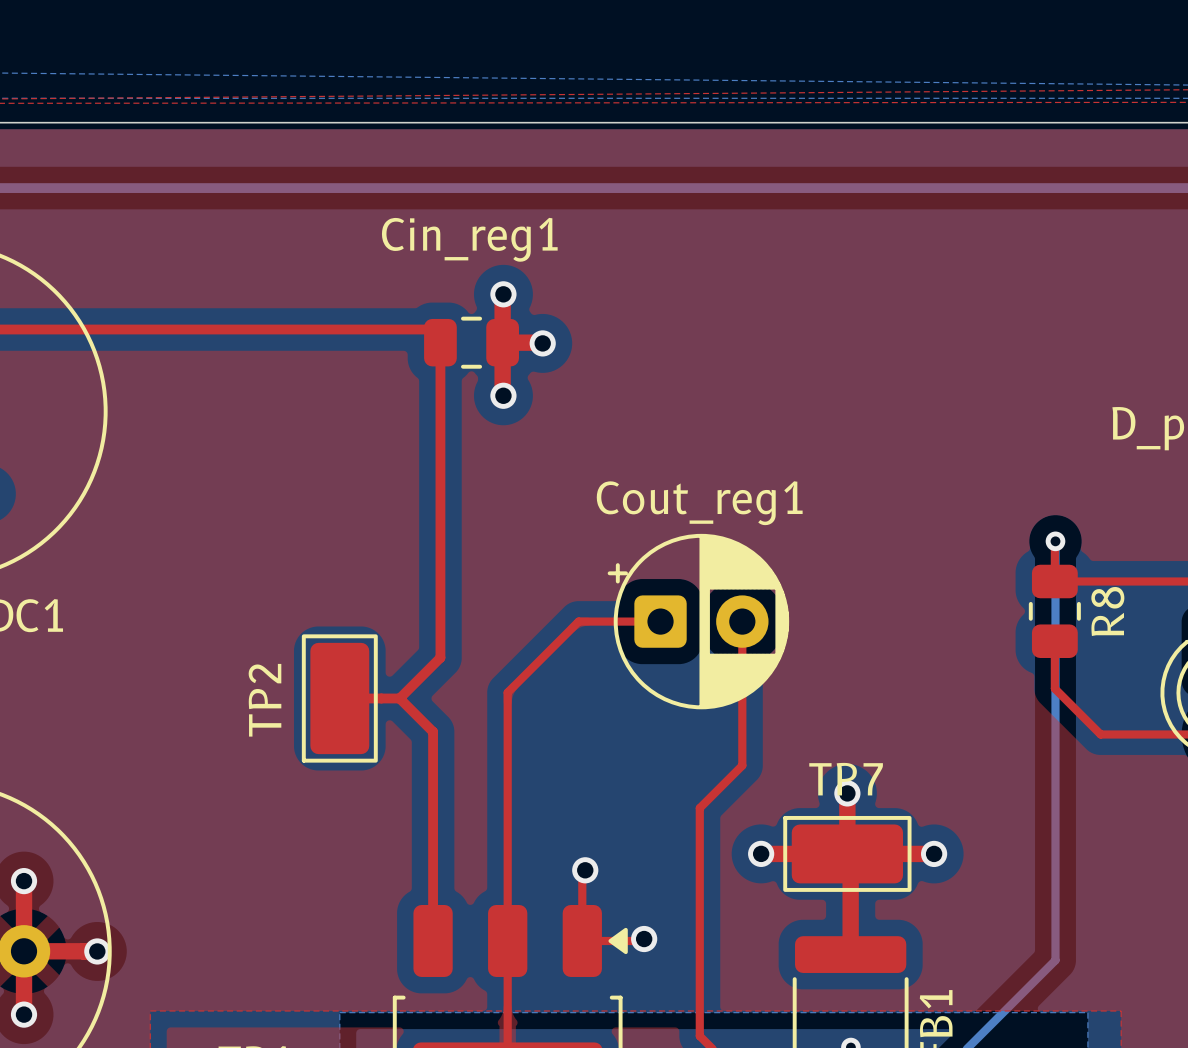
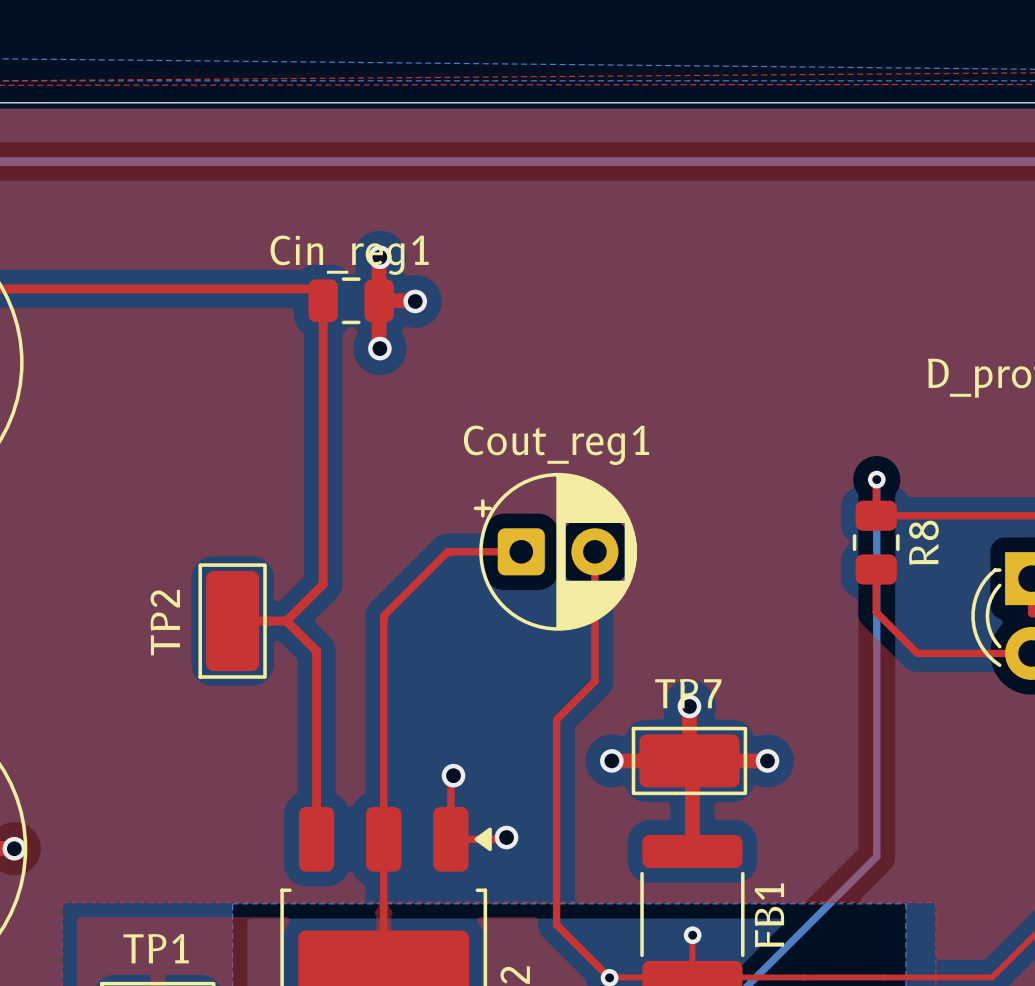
Cin_reg1 name position: Cin_reg1 (469, 239) -> Cin_reg1 (349, 255)

